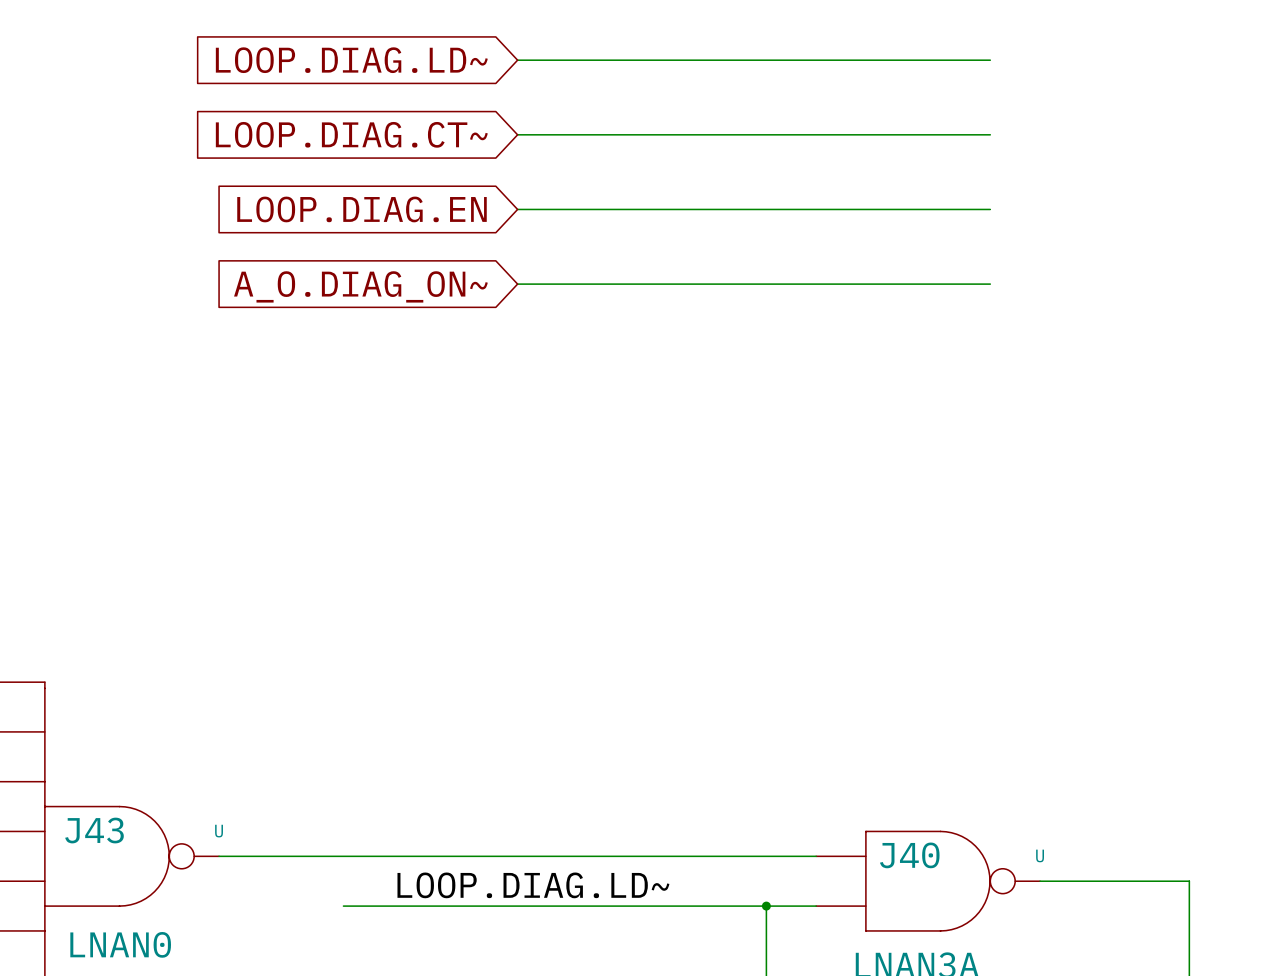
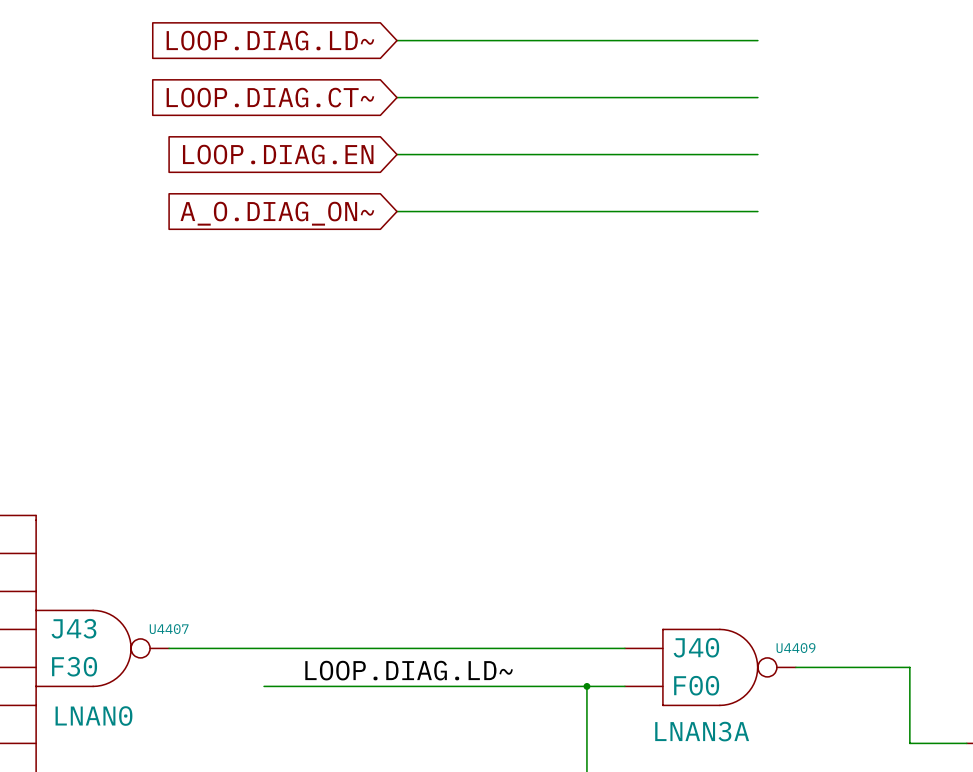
U name: U (219, 831) -> U4407 (169, 629)
U name: U (1040, 855) -> U4409 (796, 648)
U value: none -> F30 (74, 666)
U value: none -> F00 (696, 685)

